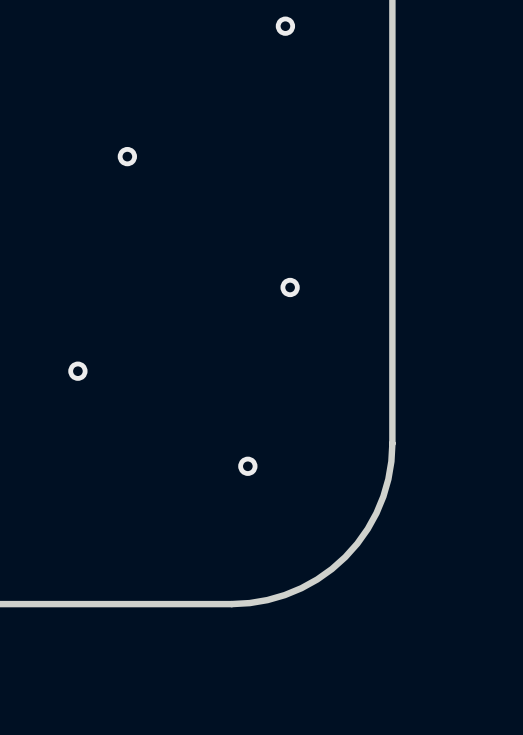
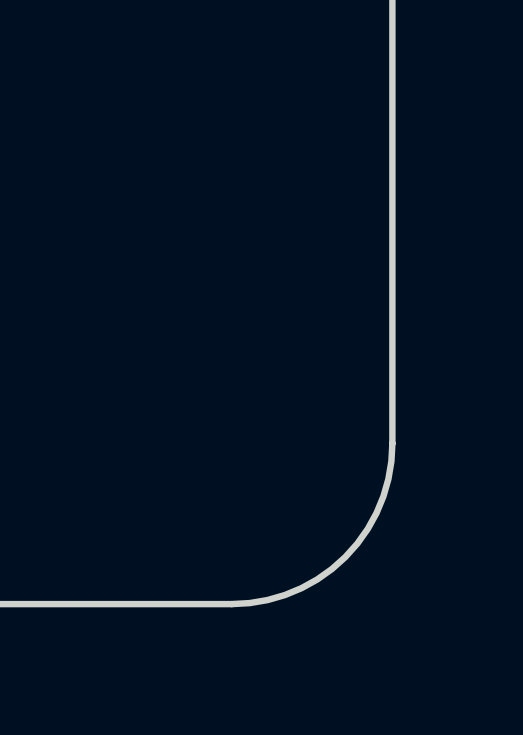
via: (285, 26) -> none
via: (127, 156) -> none
via: (290, 287) -> none
via: (77, 371) -> none
via: (247, 466) -> none

